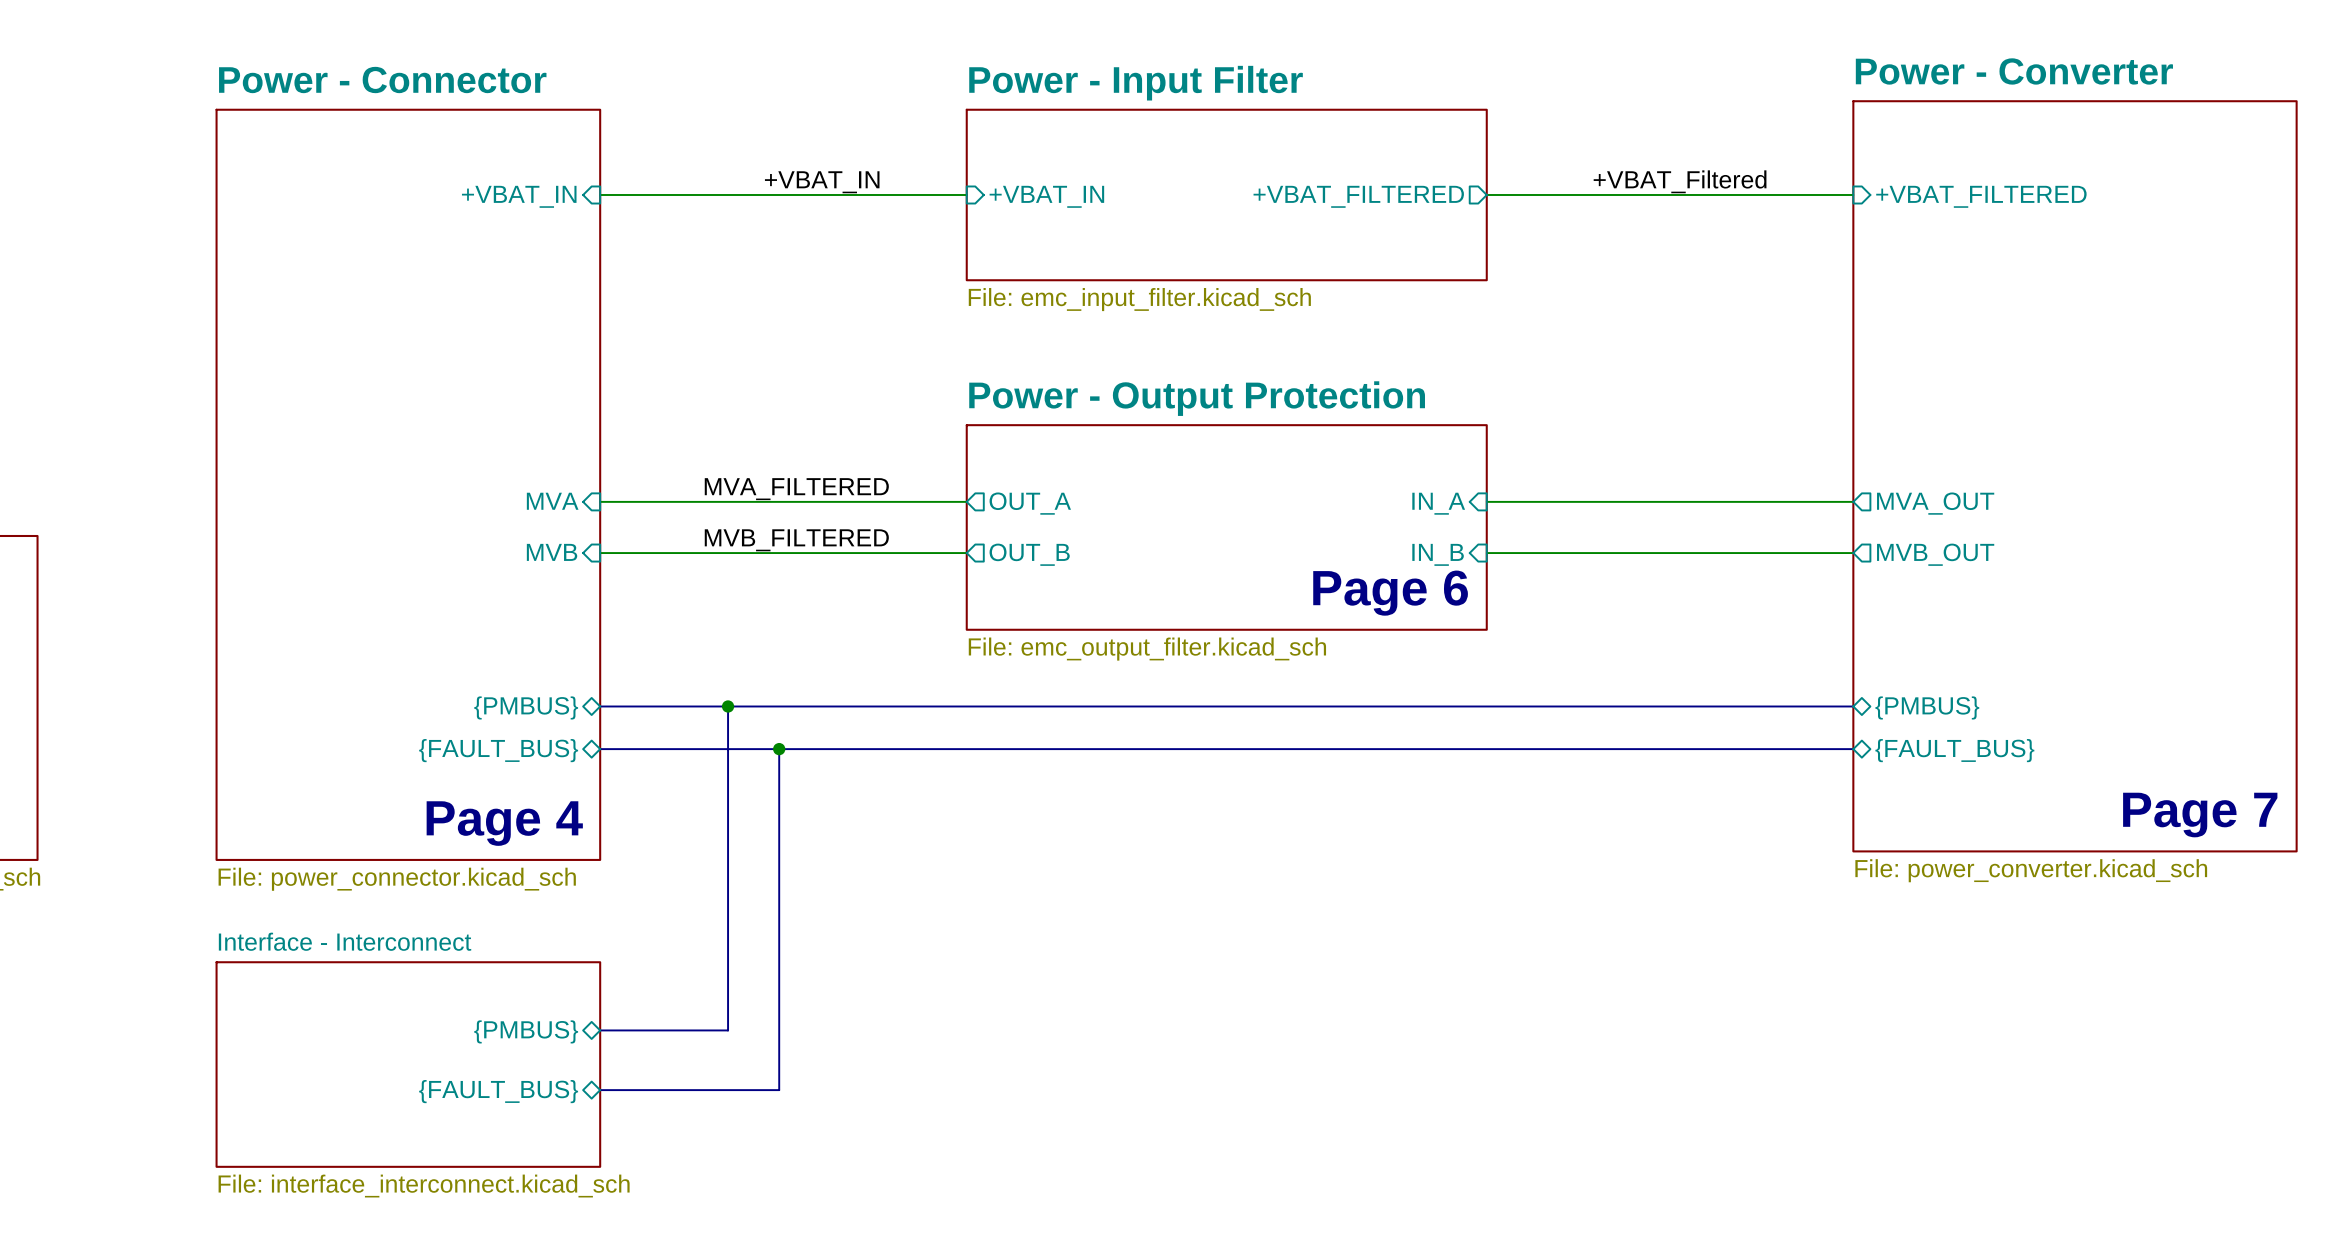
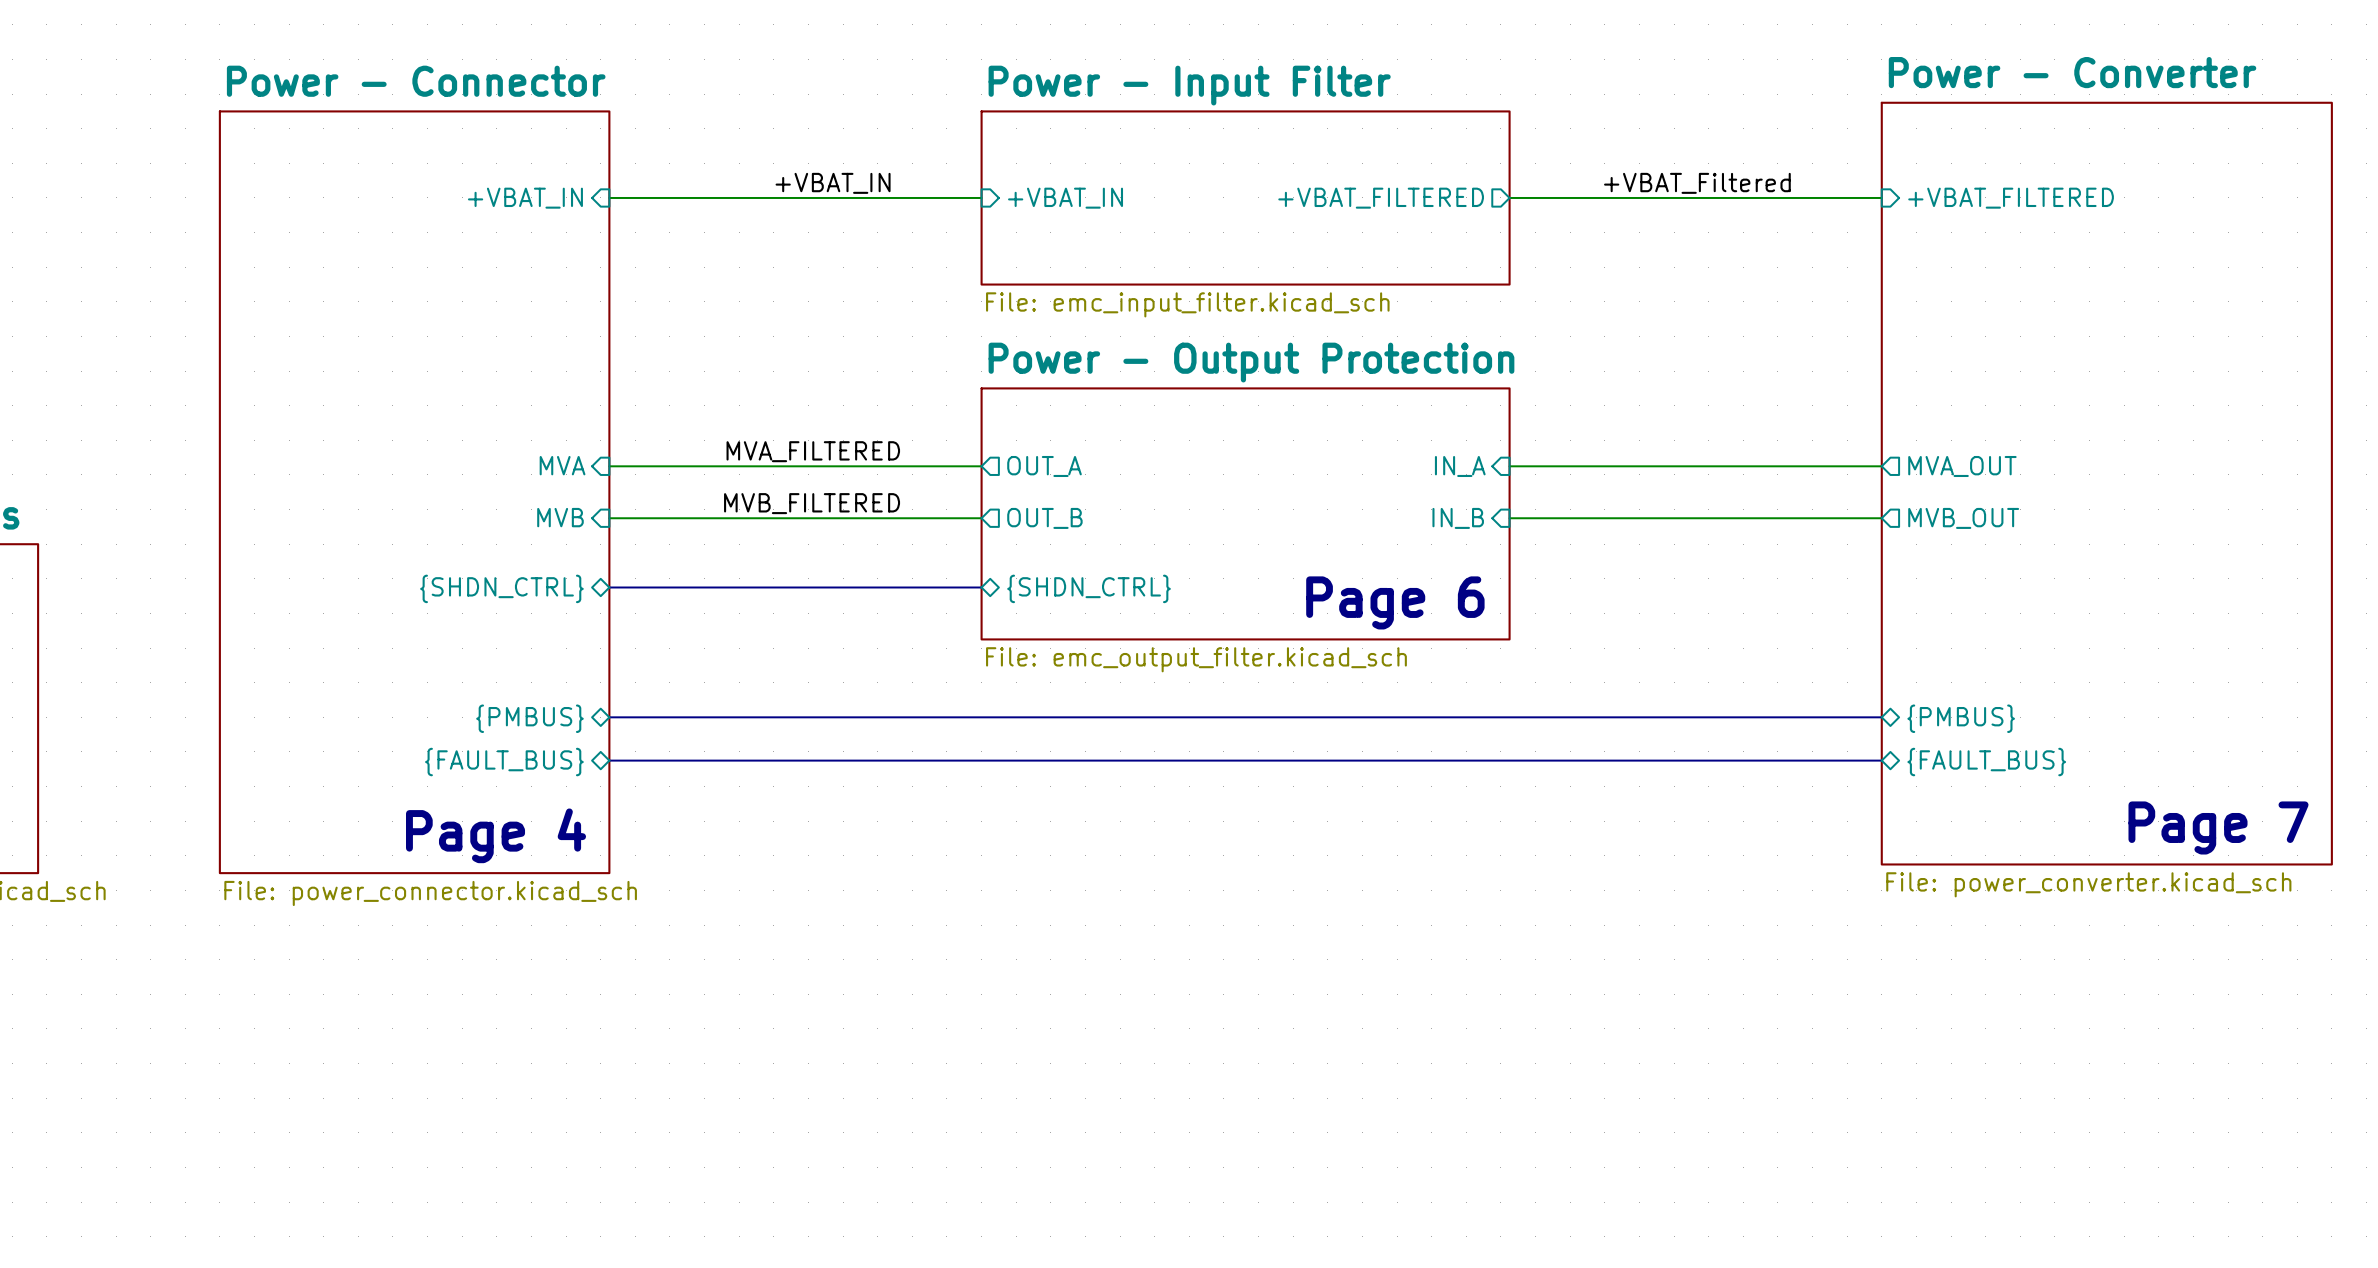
label position: MVA_FILTERED (796, 489) -> MVA_FILTERED (813, 451)
sheet pin position: MVA (552, 501) -> MVA (562, 465)
wire: (600, 501) (966, 501) -> (609, 466) (981, 466)
wire: (1486, 501) (1853, 501) -> (1509, 466) (1881, 466)
sheet pin position: OUT_A (1030, 503) -> OUT_A (1044, 466)
sheet pin position: IN_A (1438, 503) -> IN_A (1460, 466)
sheet pin position: MVA_OUT (1935, 503) -> MVA_OUT (1962, 466)
sheet Power - Output Protection: none -> File: emc_output_filter.kicad_sch (1245, 513)
sheet Power - Output Protection: File: emc_output_filter.kicad_sch (1226, 527) -> none
label position: MVB_FILTERED (796, 540) -> MVB_FILTERED (812, 503)
sheet pin position: MVB (552, 552) -> MVB (560, 517)
wire: (600, 553) (966, 553) -> (609, 518) (981, 518)
wire: (1486, 553) (1853, 553) -> (1509, 518) (1881, 518)
sheet pin position: OUT_B (1029, 554) -> OUT_B (1044, 518)
sheet pin position: IN_B (1438, 554) -> IN_B (1458, 518)
sheet pin position: MVB_OUT (1935, 554) -> MVB_OUT (1963, 518)
bus: none -> (609, 587) (981, 587)
sheet pin: none -> {SHDN_CTRL} (501, 588)
sheet pin: none -> {SHDN_CTRL} (1089, 588)
bus: (728, 706) (728, 1030) (600, 1030) -> none
junction: (728, 706) -> none
bus: (779, 749) (779, 1090) (600, 1090) -> none
junction: (779, 749) -> none
sheet pin: {PMBUS} (526, 1031) -> none
sheet Interface - Interconnect: File: interface_interconnect.kicad_sch (408, 1064) -> none
sheet pin: {FAULT_BUS} (498, 1091) -> none

